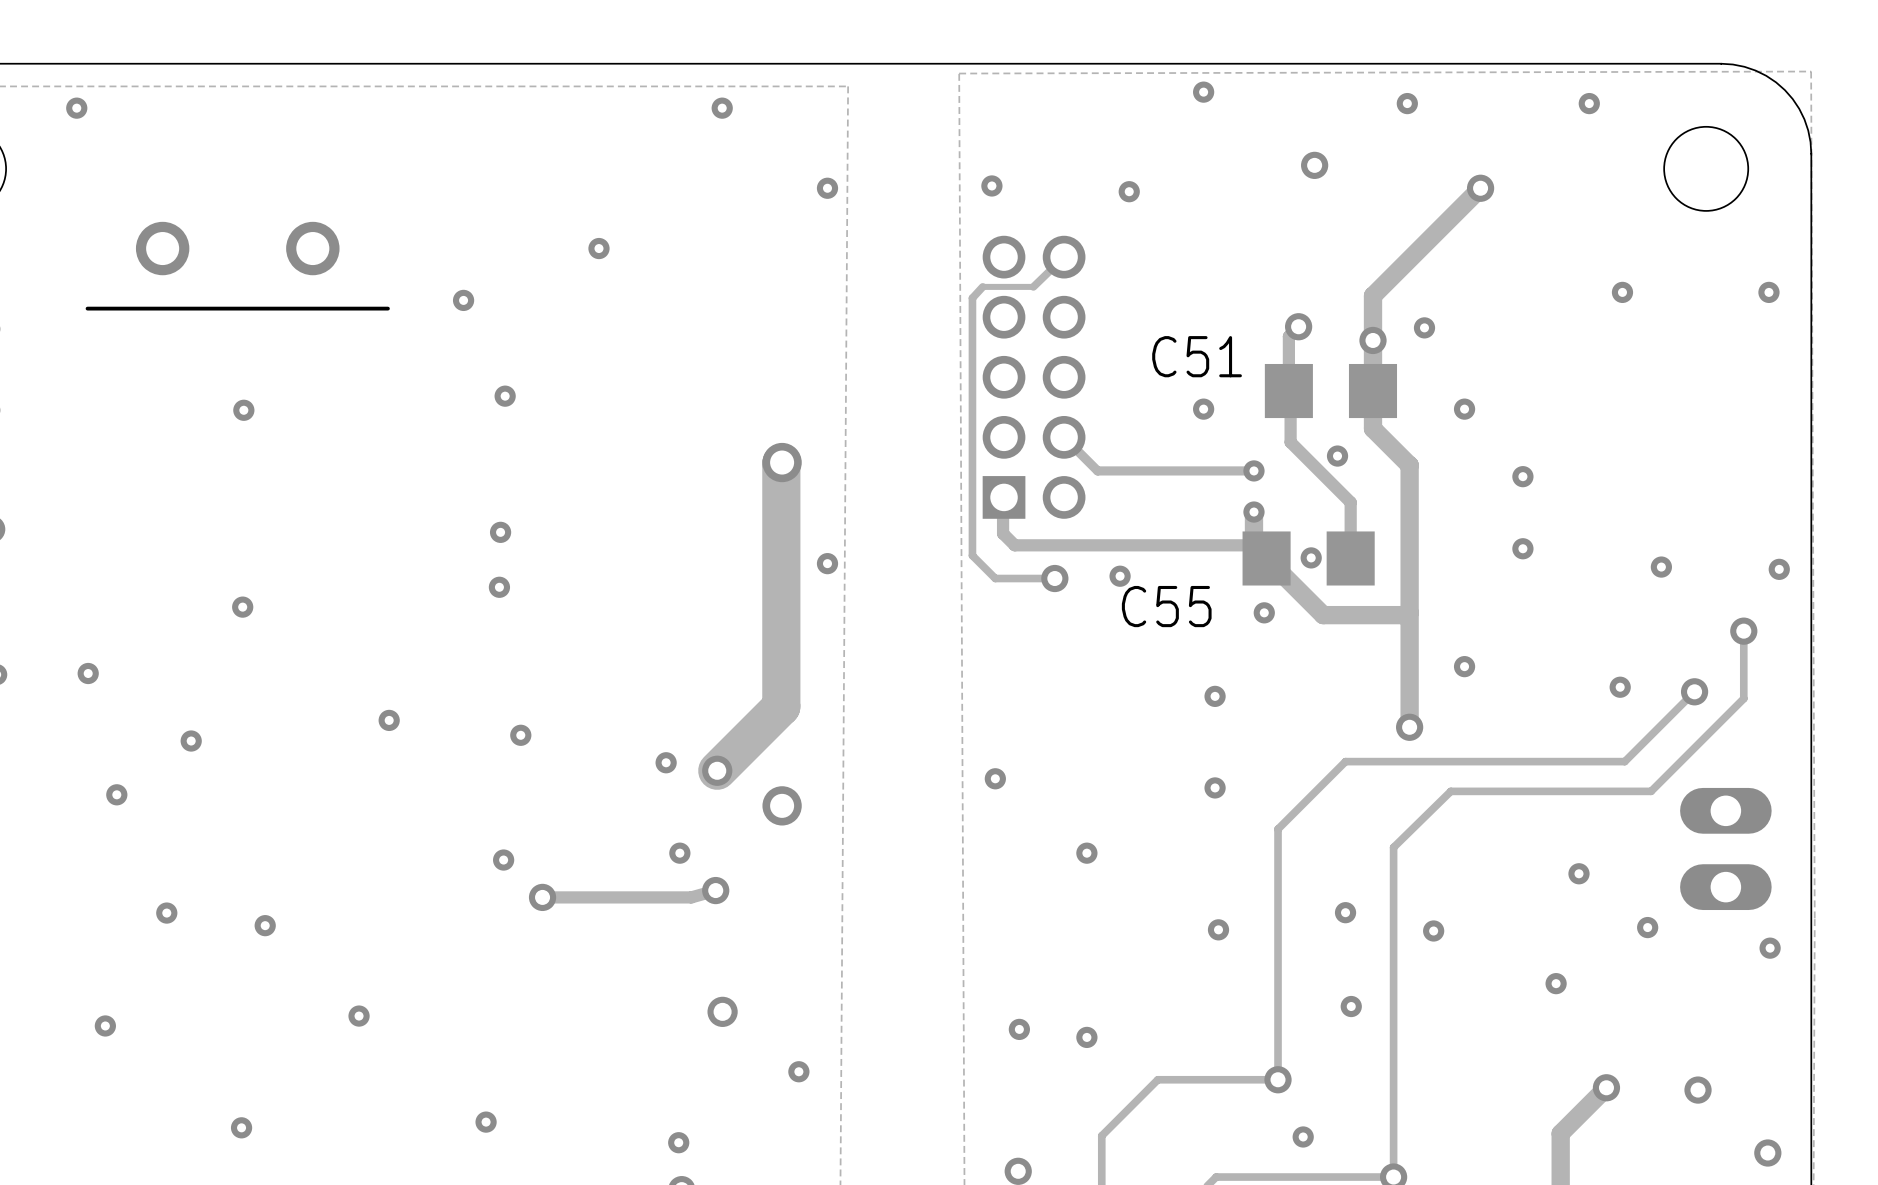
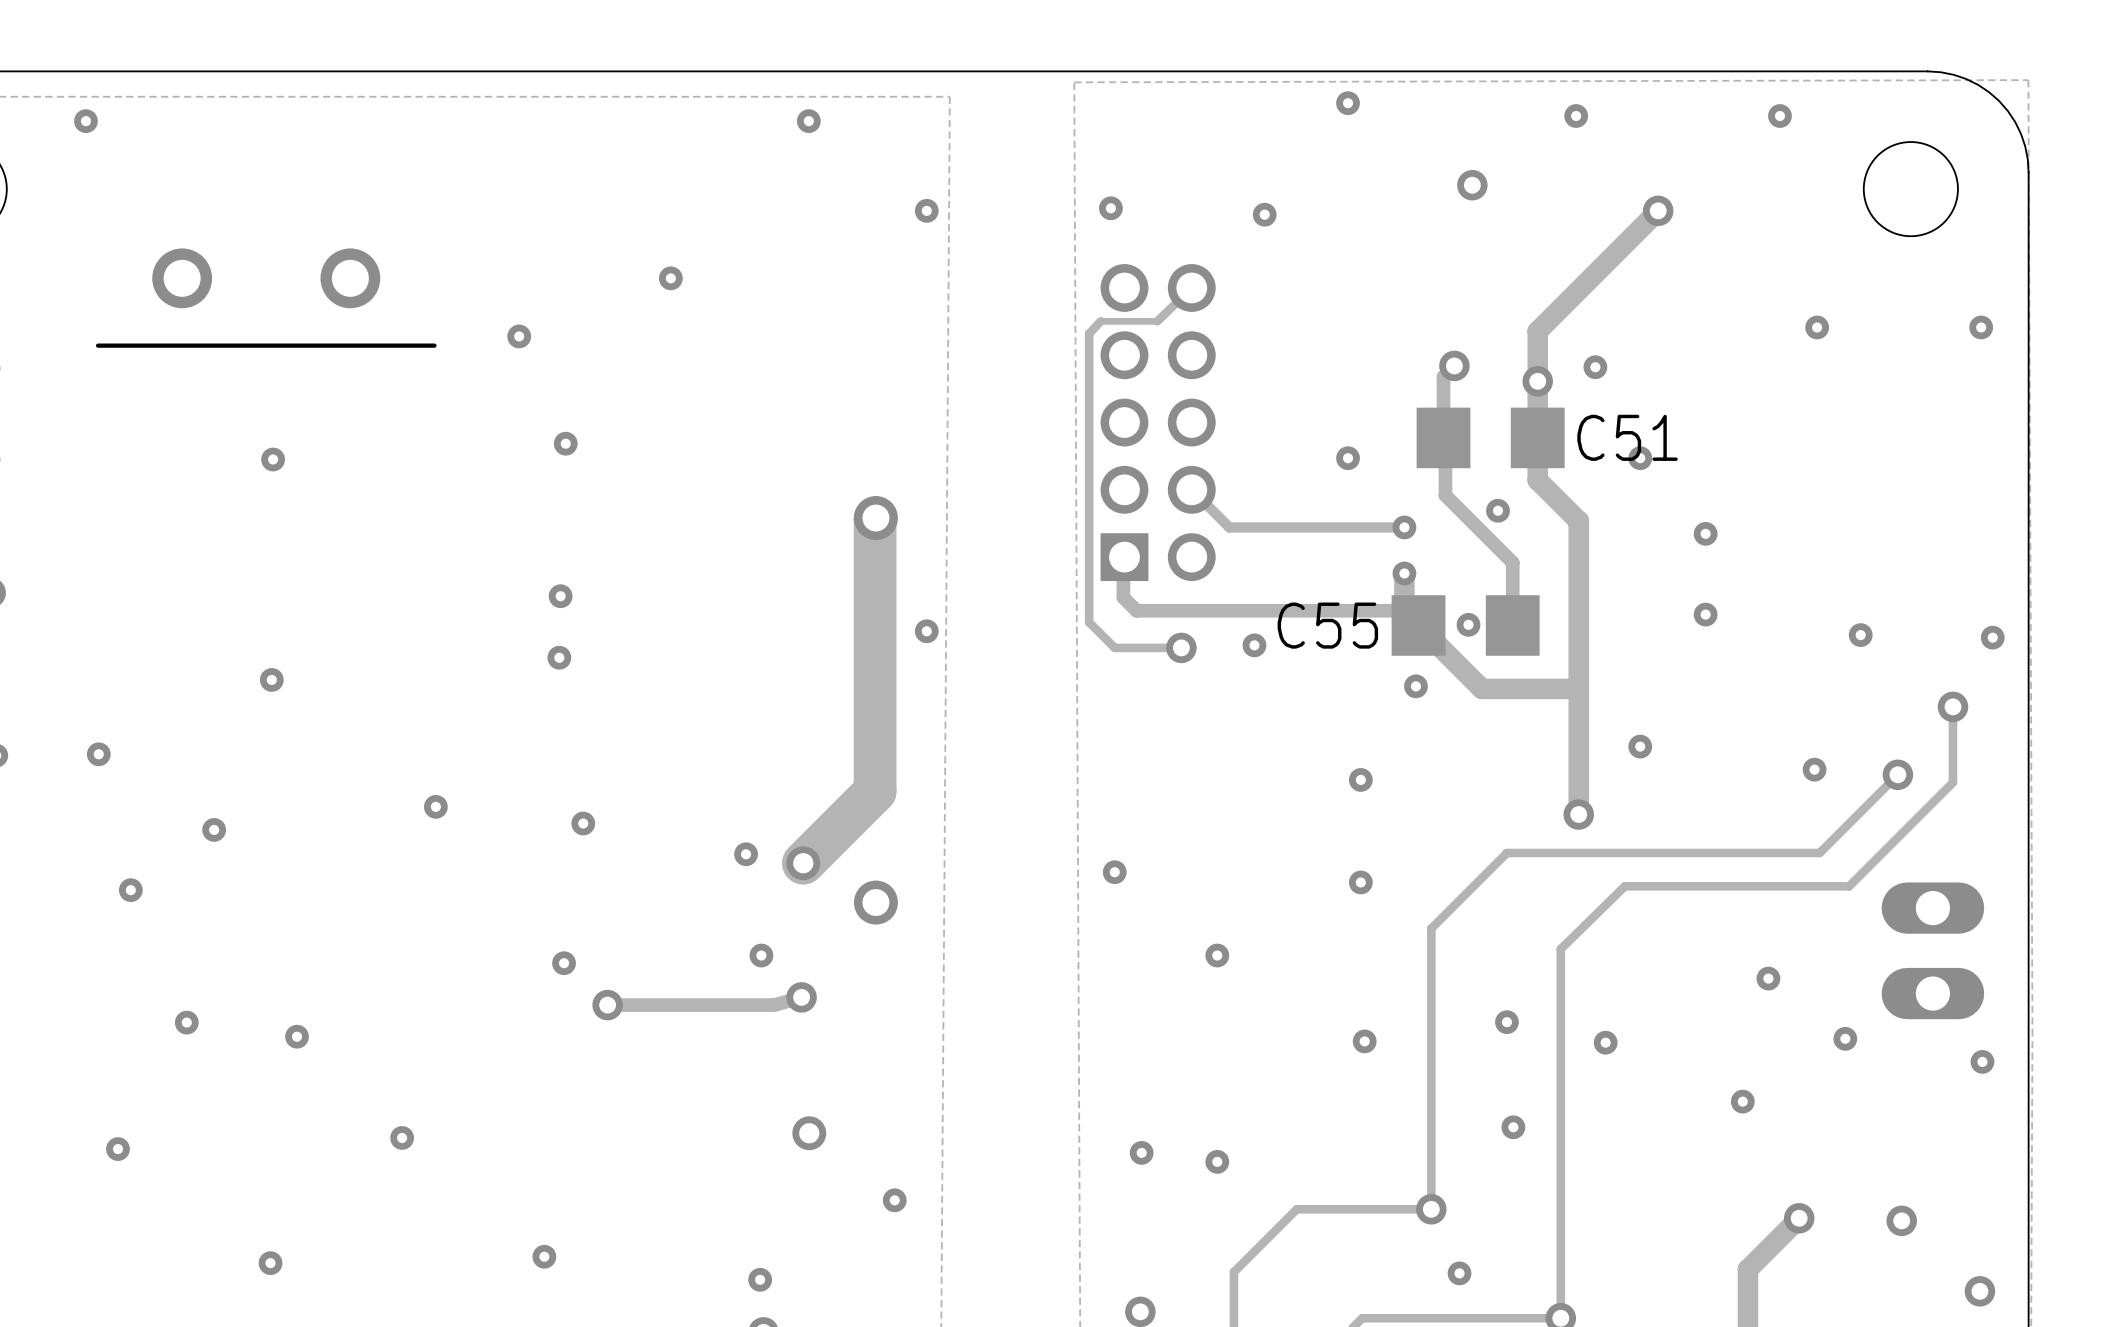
C51 name position: C51 (1197, 356) -> C51 (1627, 437)
C55 name position: C55 (1166, 606) -> C55 (1327, 625)

